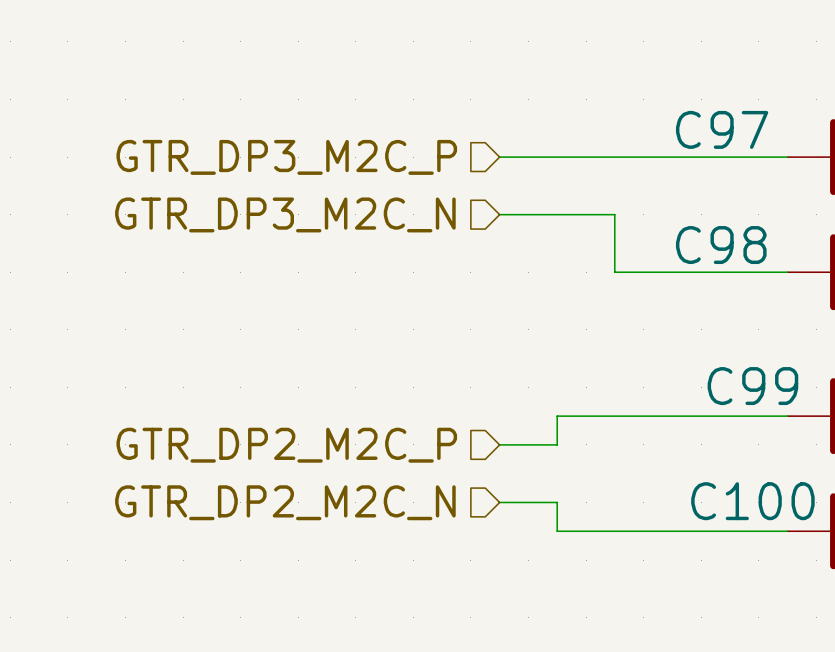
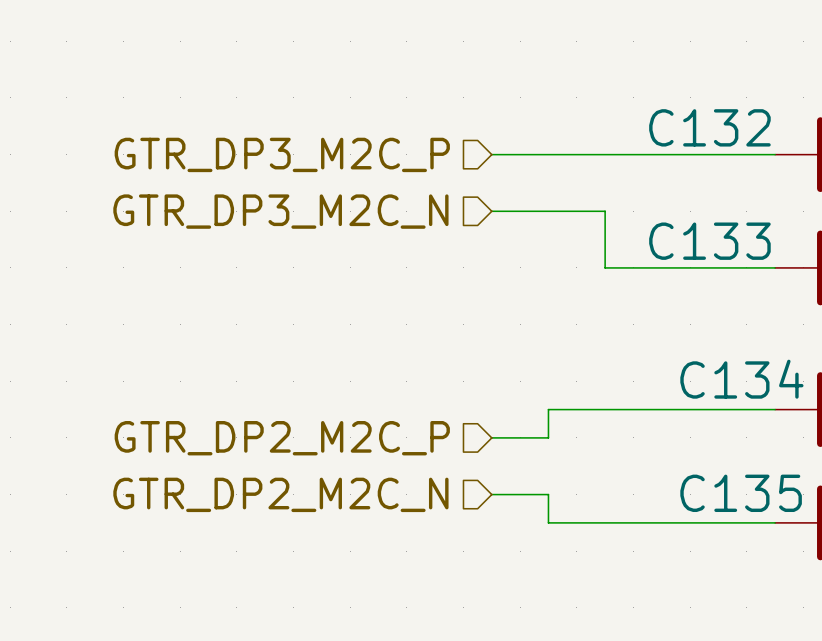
C97 name: C97 (722, 129) -> C132 (709, 127)
C98 name: C98 (721, 245) -> C133 (709, 241)
C99 name: C99 (752, 386) -> C134 (741, 379)
C100 name: C100 (752, 501) -> C135 (741, 493)

